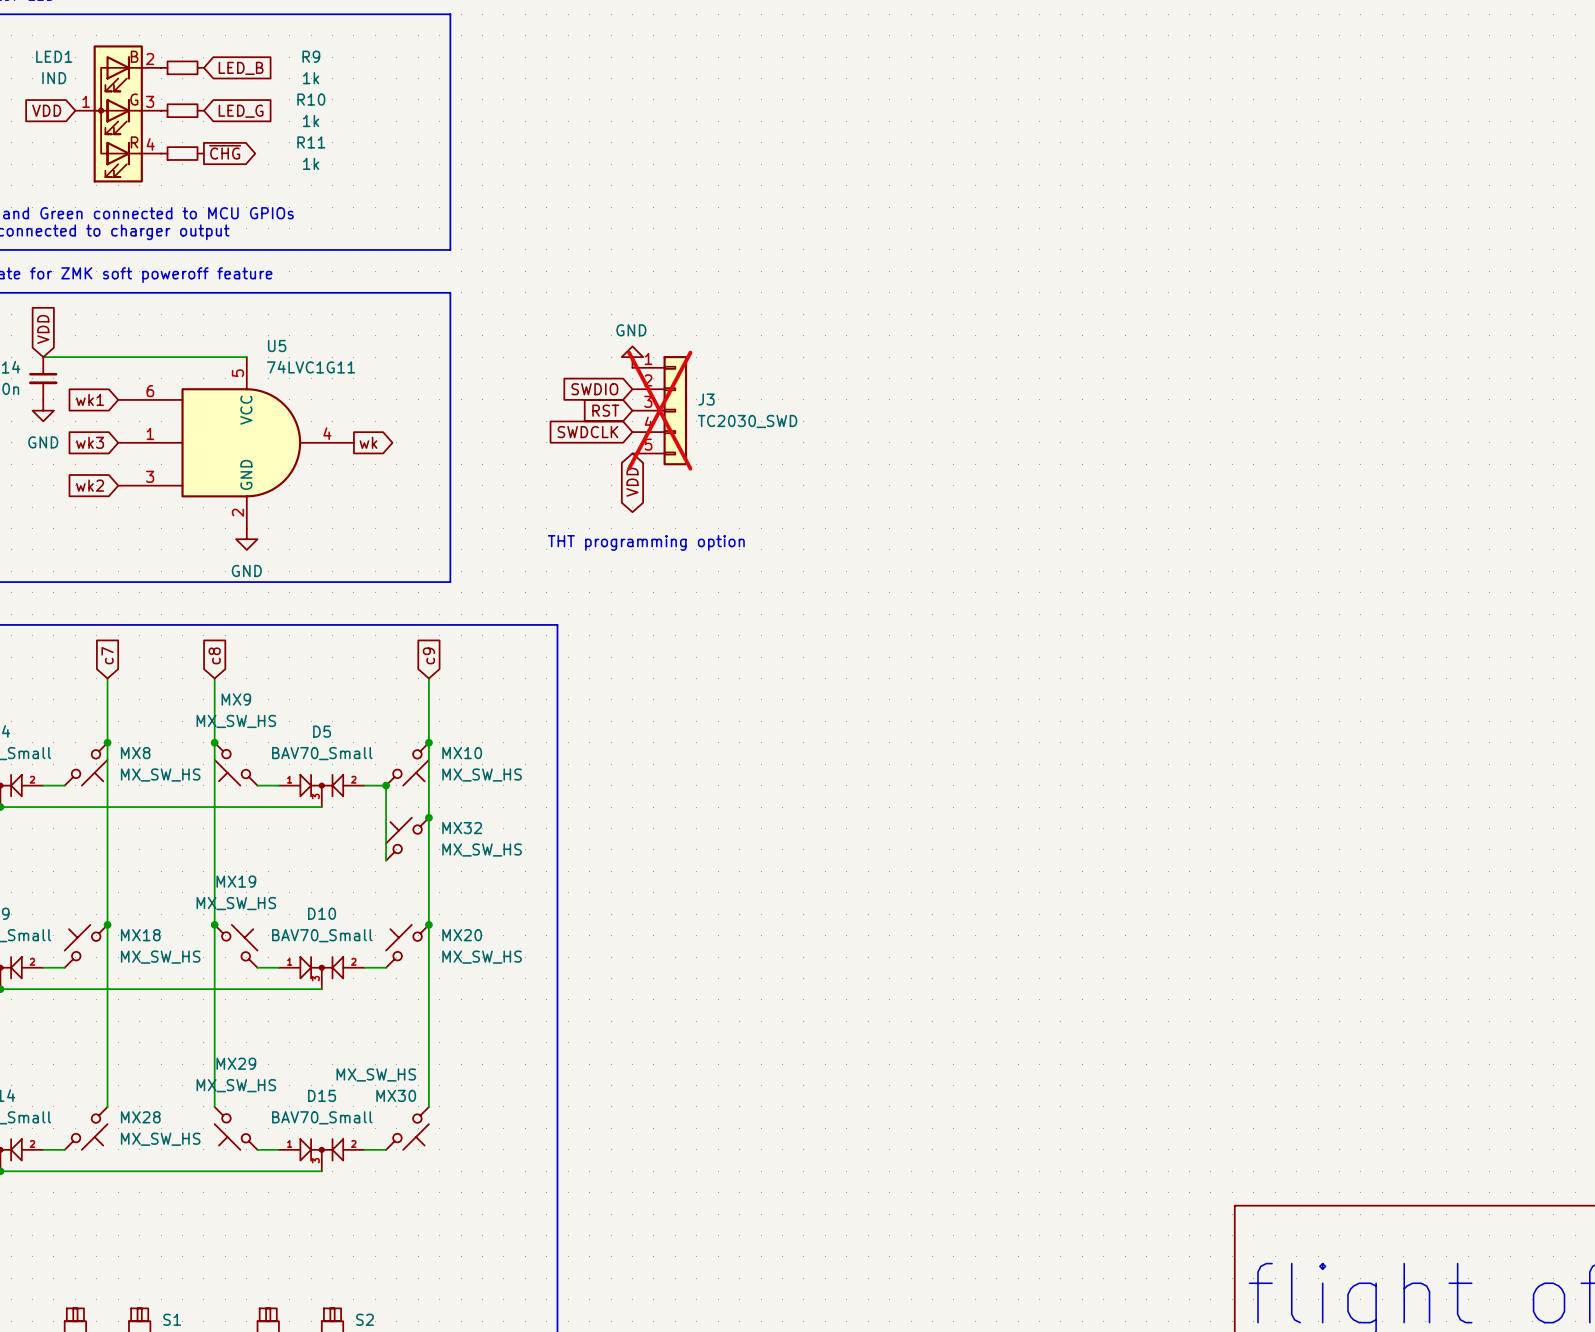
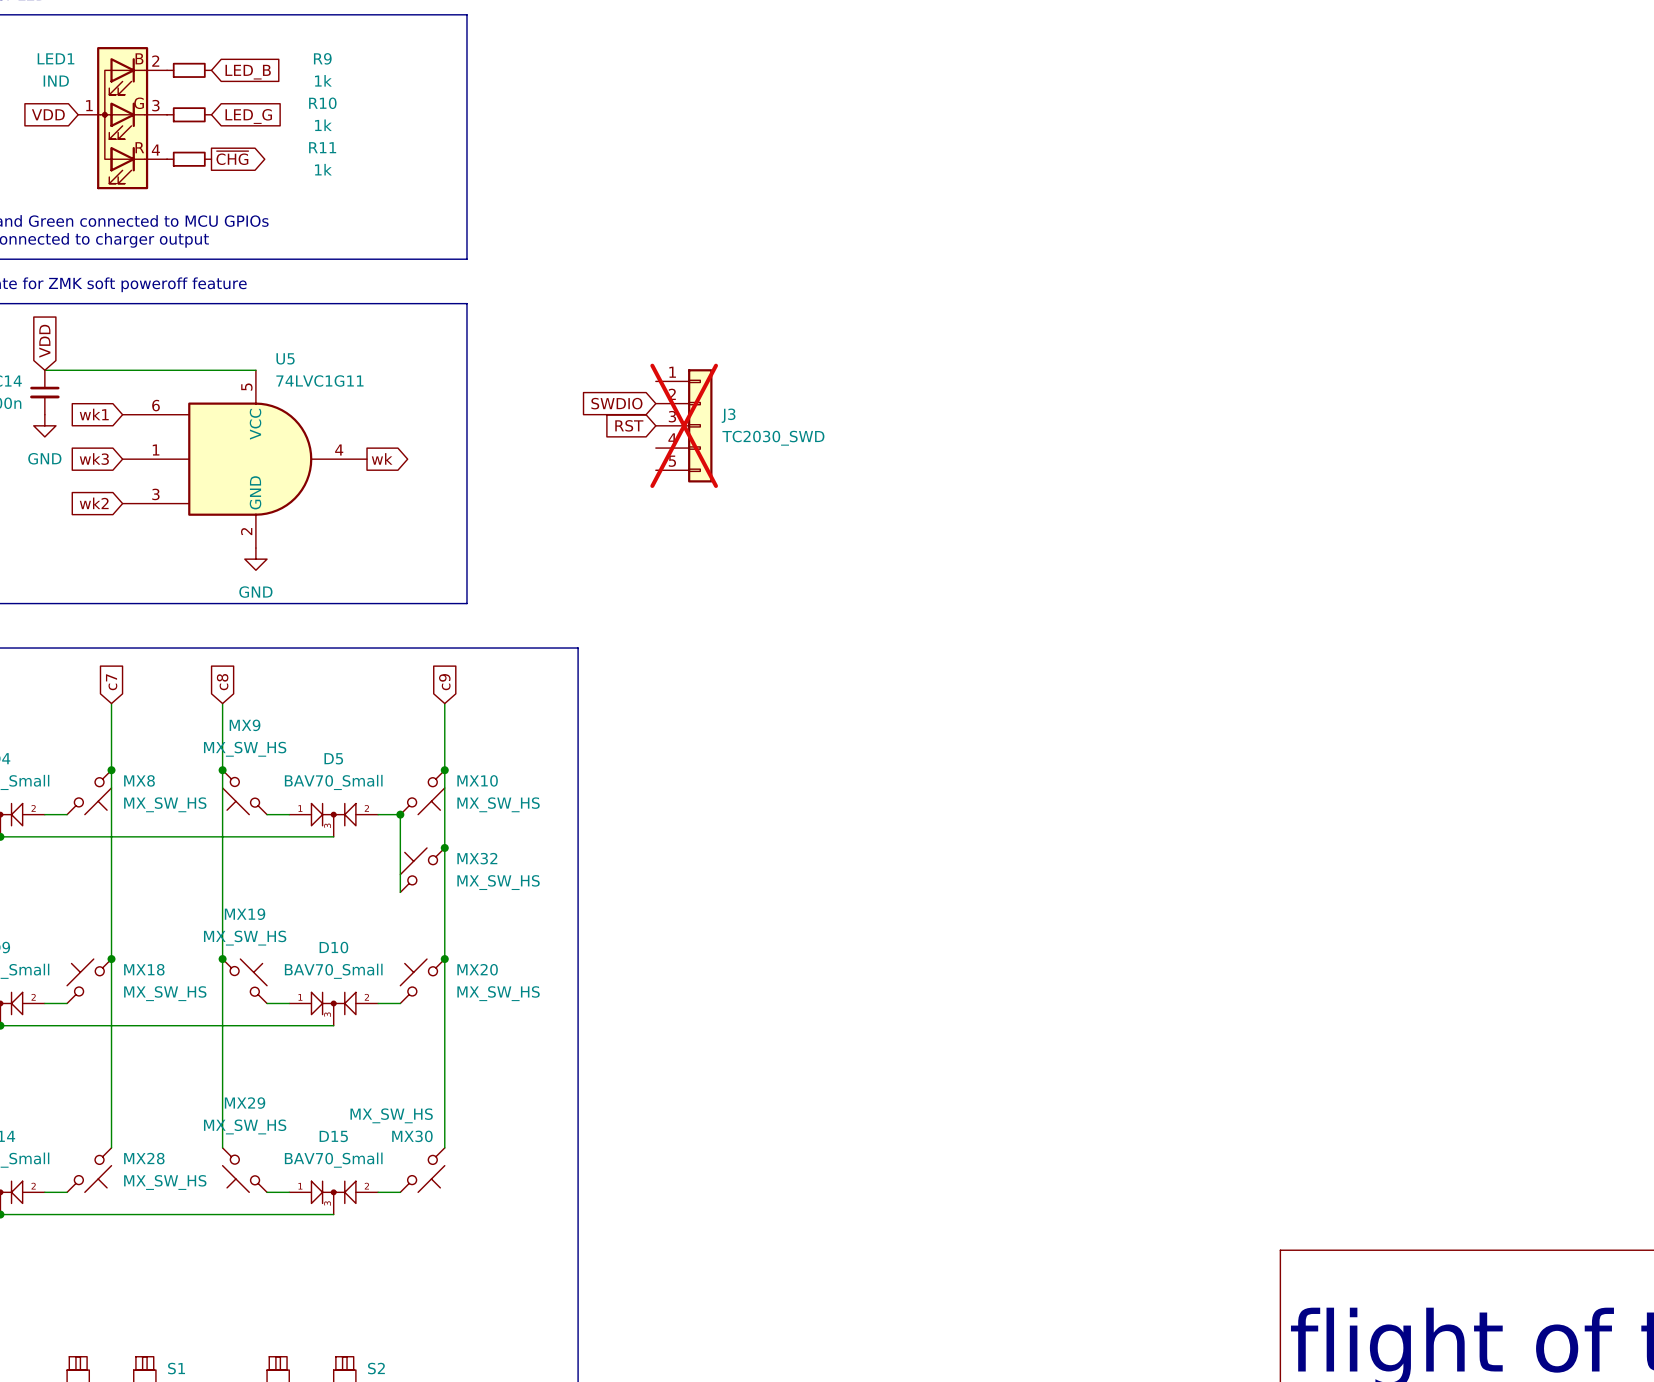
power symbol: GND (632, 357) -> none
global label: SWDCLK (587, 432) -> none
global label: VDD (632, 482) -> none
text: THT programming option (646, 542) -> none

